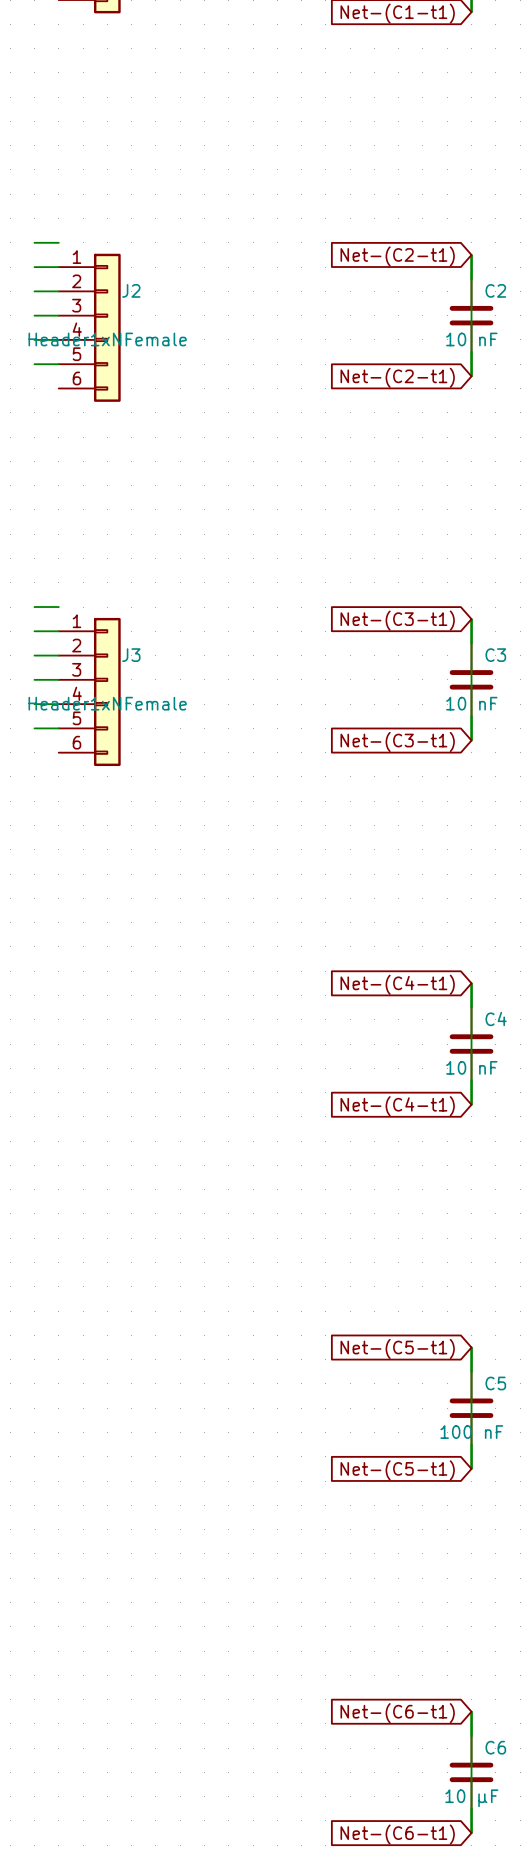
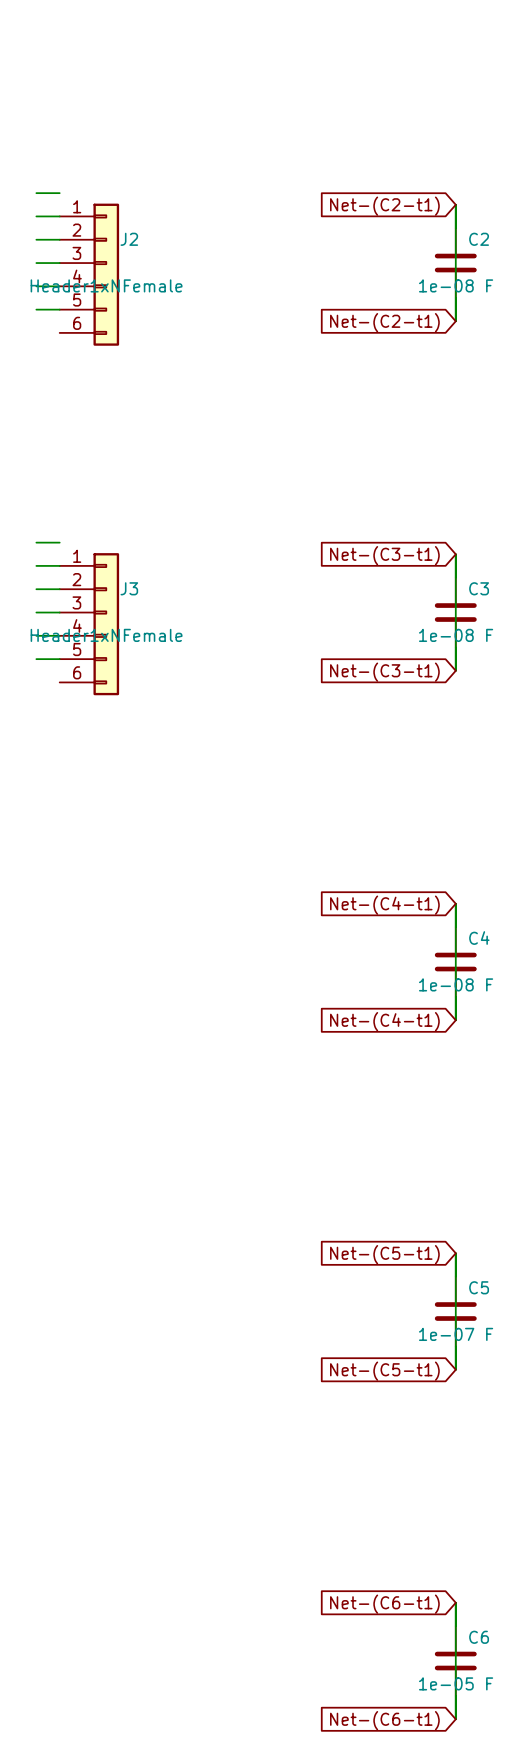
C2 value: 10 nF (471, 339) -> 1e-08 F (456, 285)
C3 value: 10 nF (471, 703) -> 1e-08 F (456, 635)
C4 value: 10 nF (471, 1067) -> 1e-08 F (456, 984)
C5 value: 100 nF (471, 1432) -> 1e-07 F (456, 1334)
C6 value: 10 µF (471, 1798) -> 1e-05 F (456, 1683)

